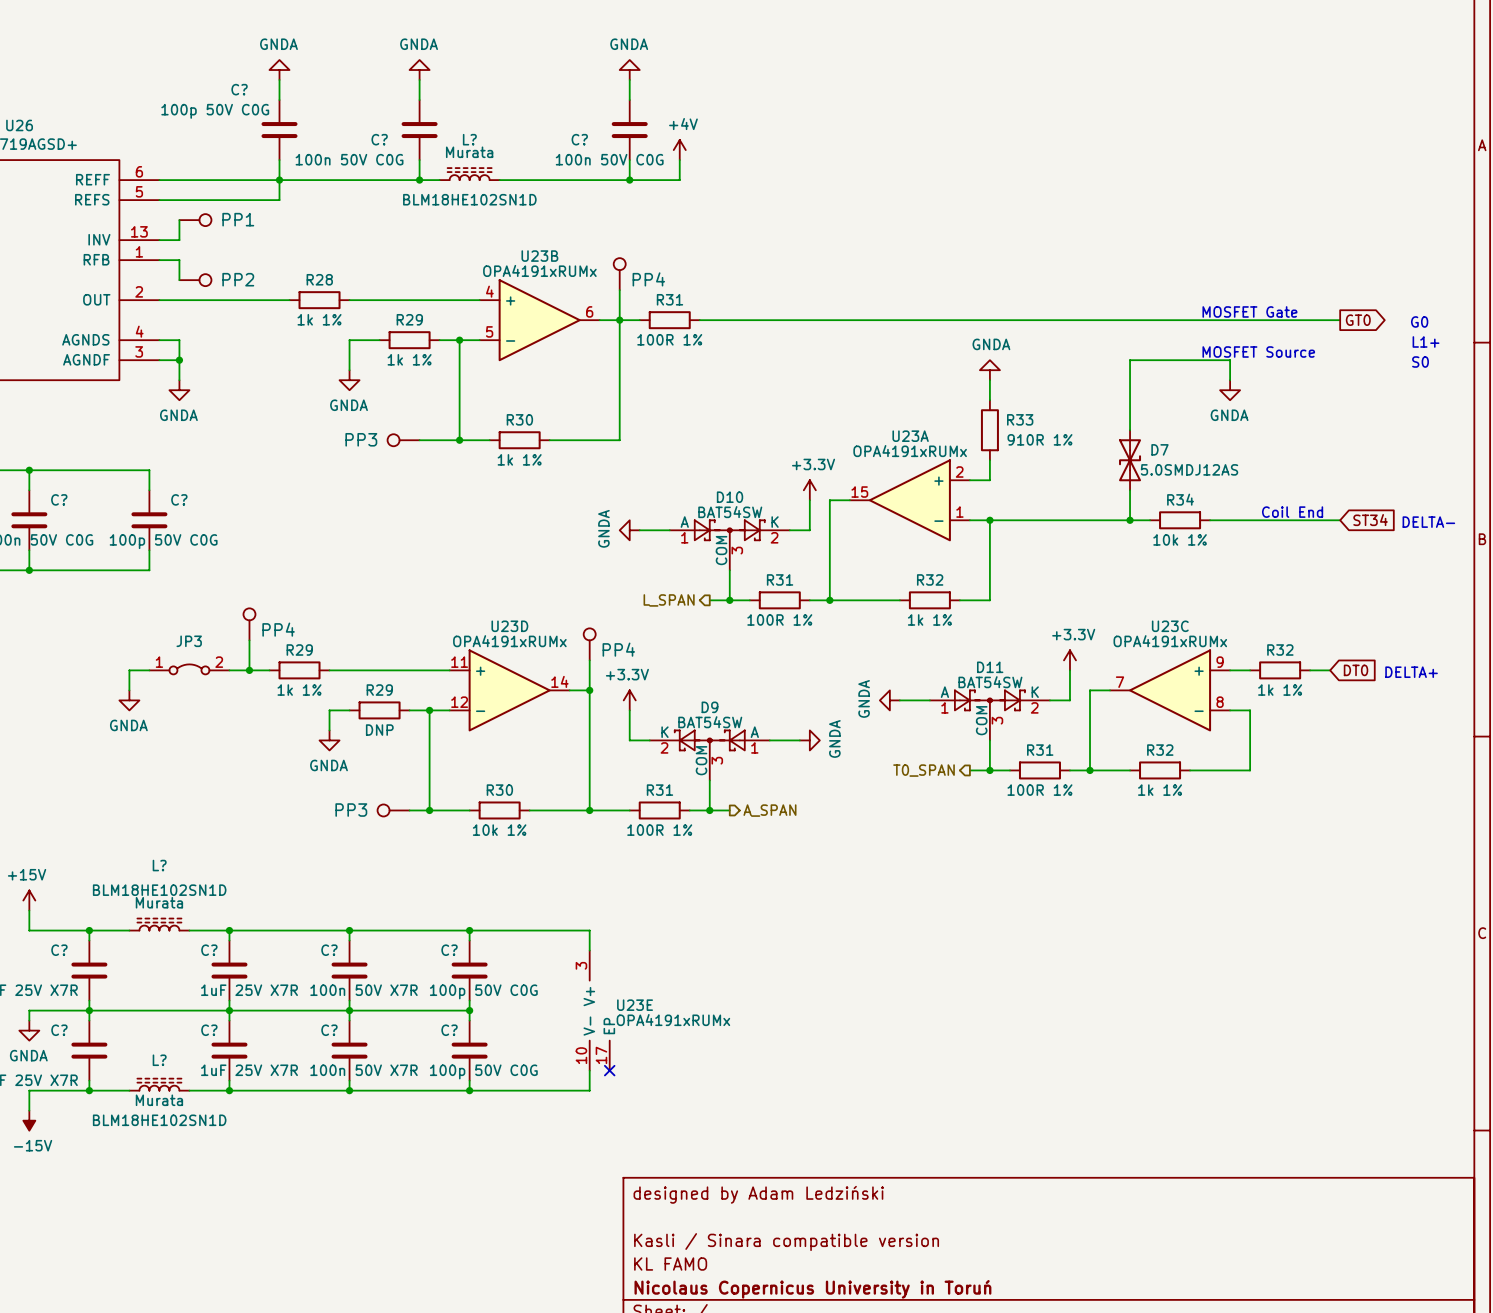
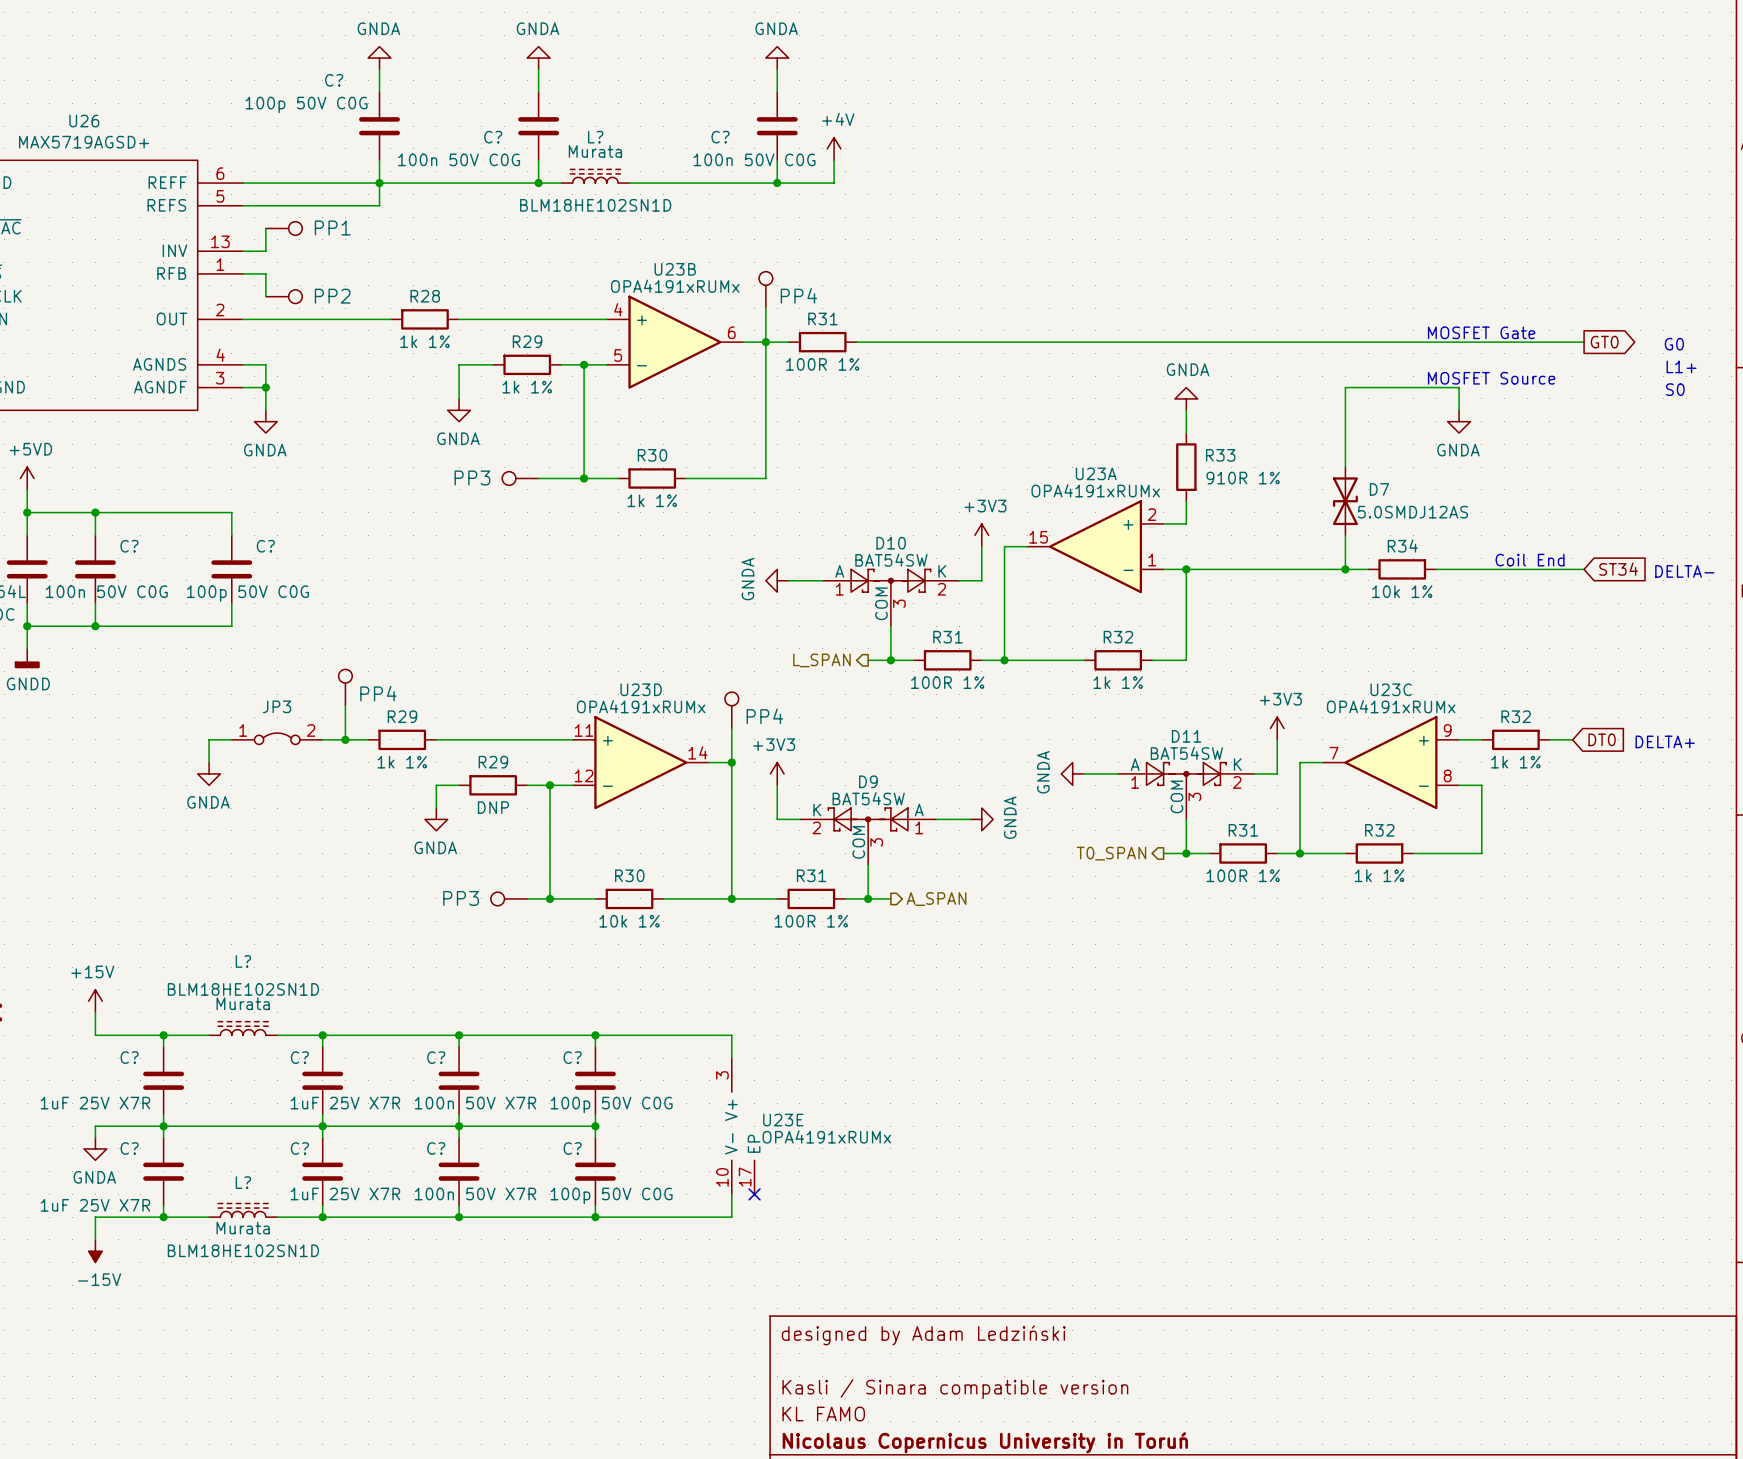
power symbol: +3.3V (809, 490) -> +3V3 (981, 535)
power symbol: +3.3V (1069, 660) -> +3V3 (1277, 728)
power symbol: +3.3V (629, 700) -> +3V3 (777, 773)

